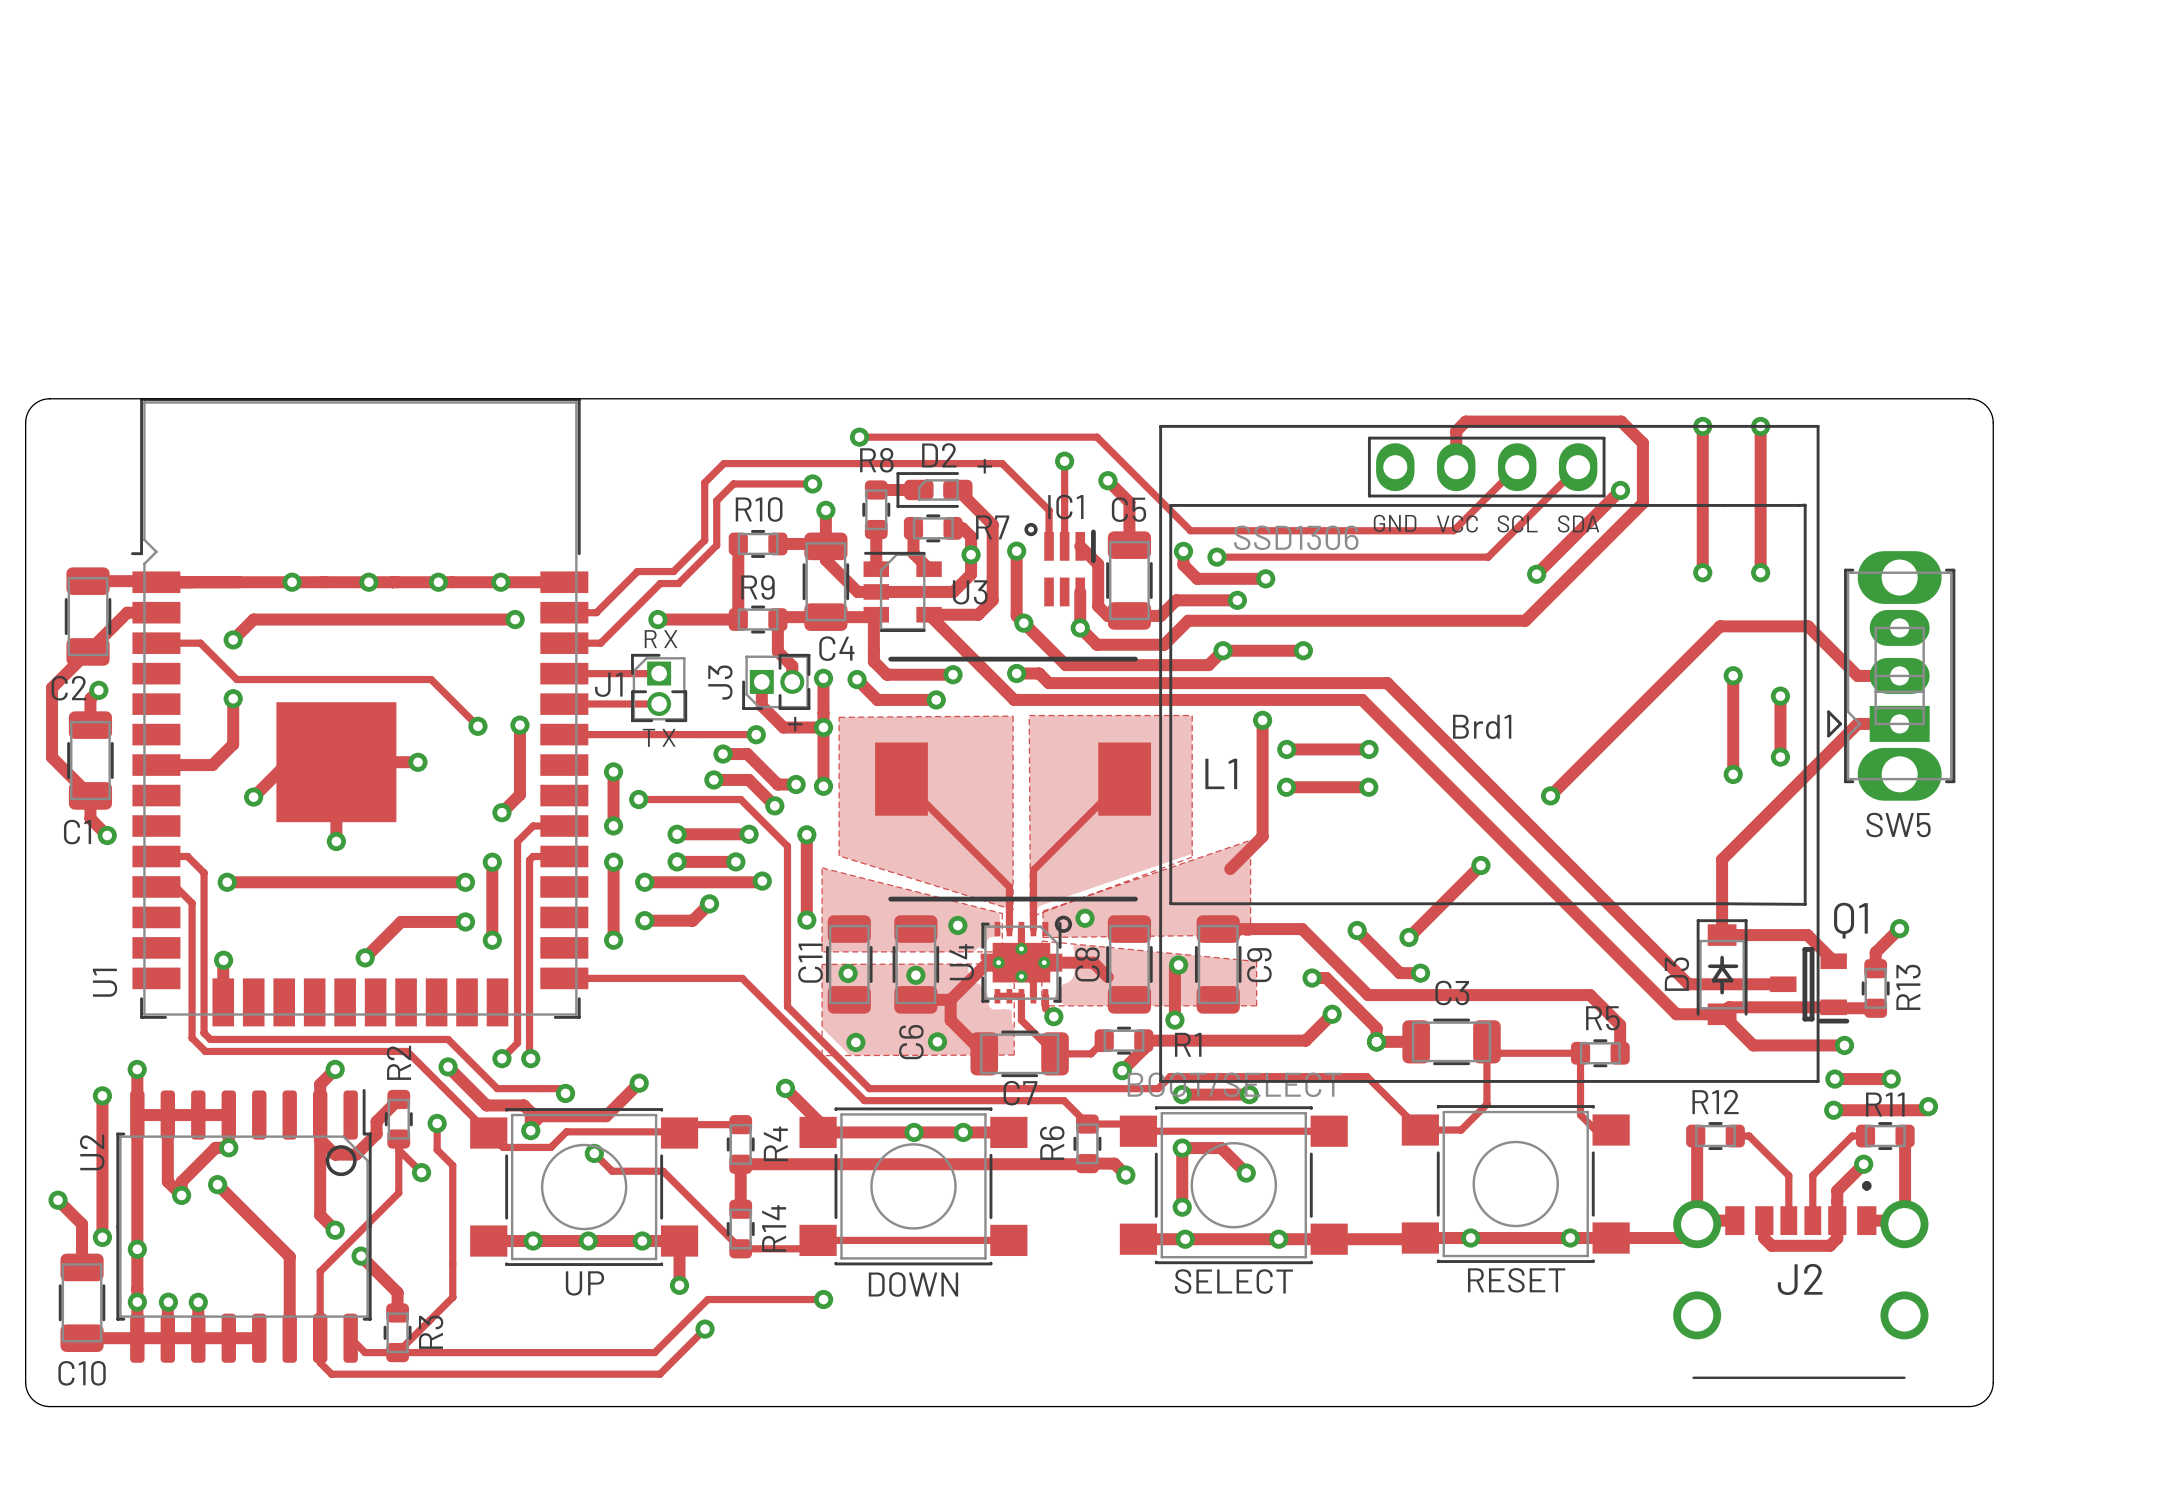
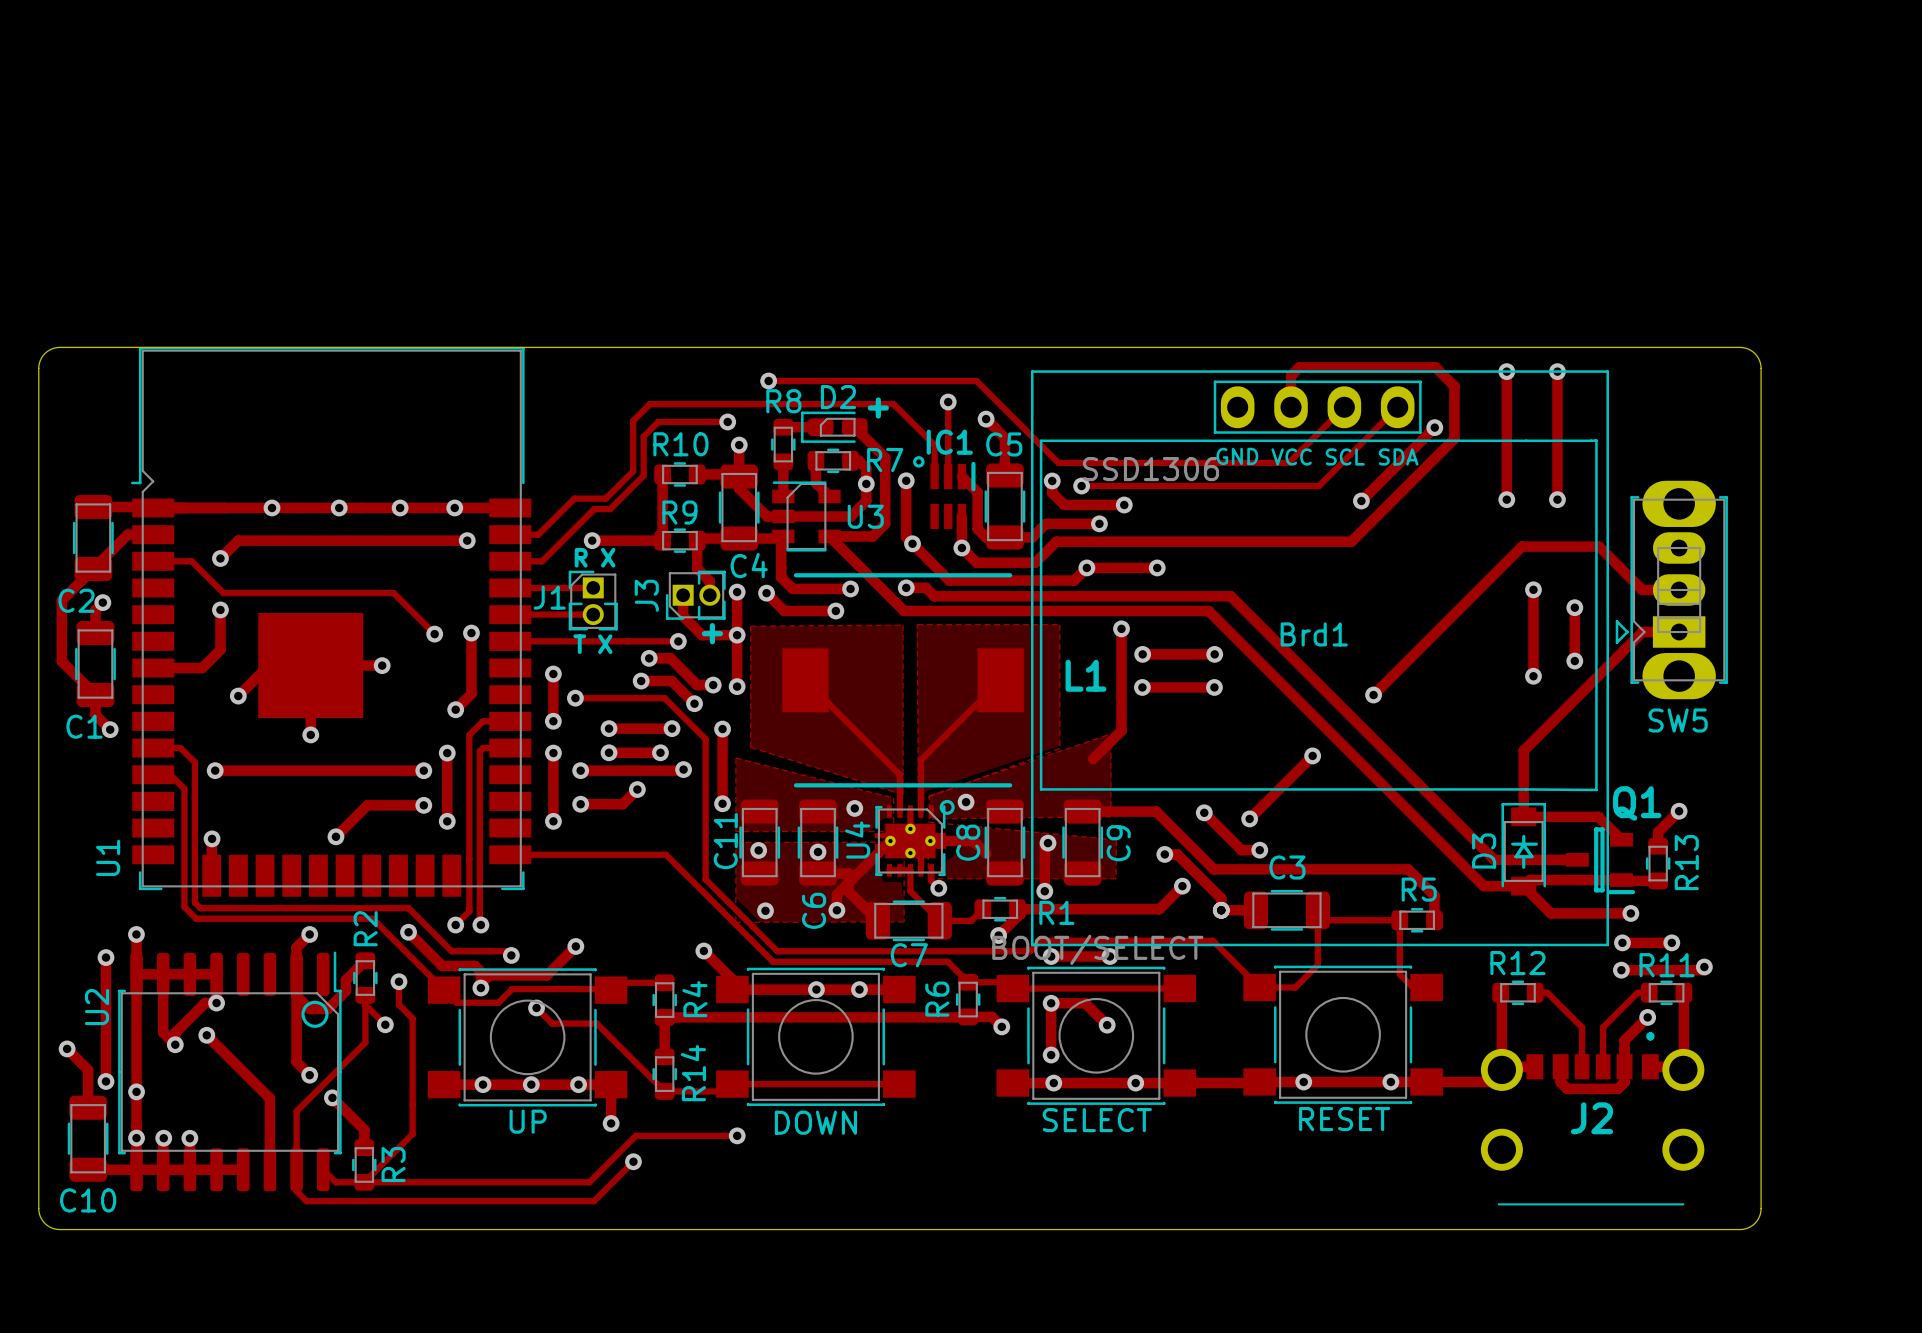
track: (998, 962) (987, 962) (950, 999) -> (890, 840) (836, 894) (836, 910)

